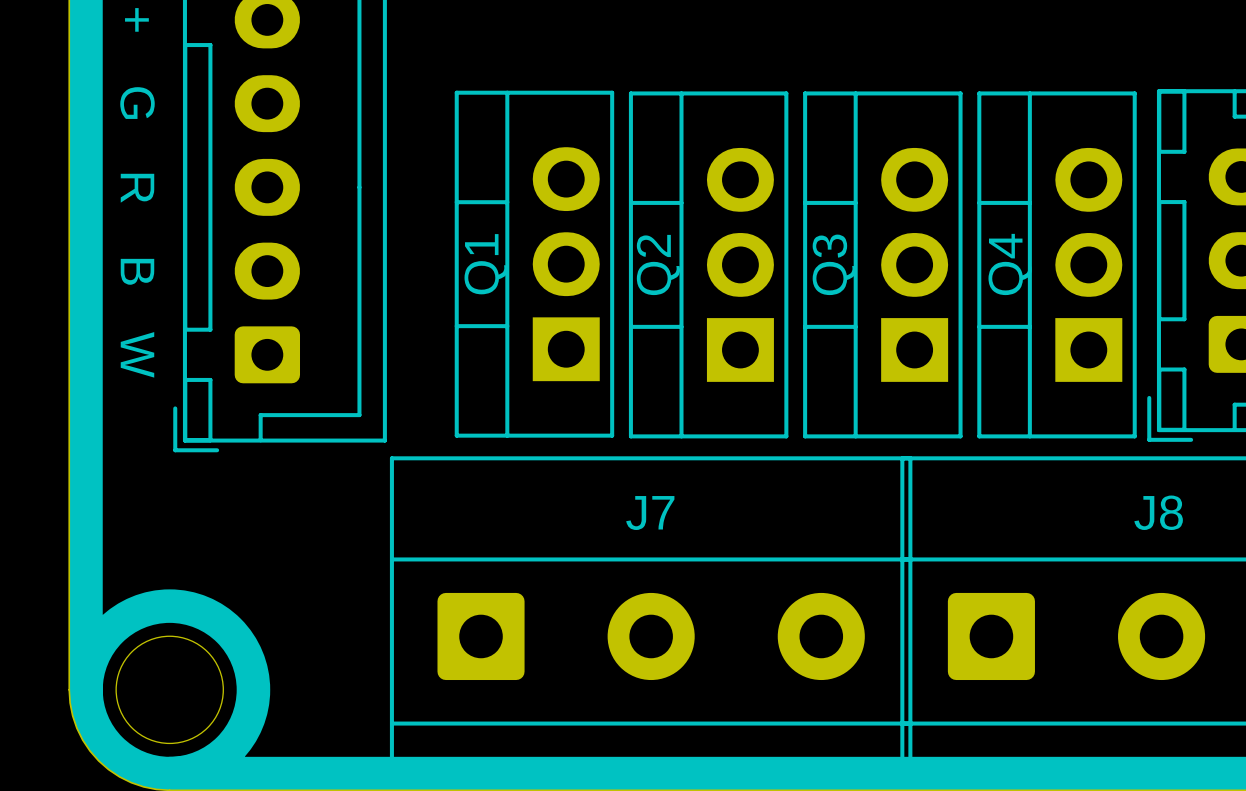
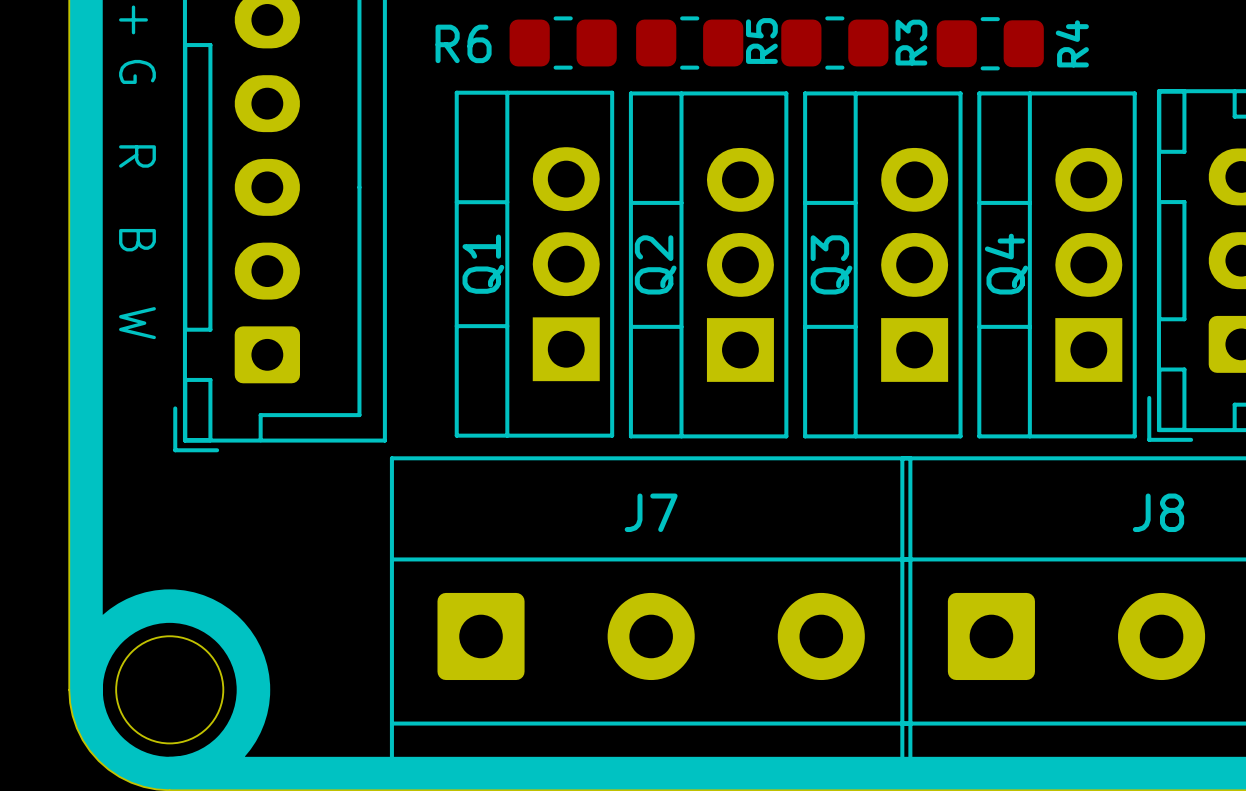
R6: none -> (563, 43)
R5: none -> (689, 43)
R3: none -> (834, 43)
R4: none -> (990, 43)
text position: G (137, 103) -> G (137, 71)
text position: R (137, 188) -> R (137, 156)
text position: B (137, 271) -> B (137, 240)
text position: W (137, 354) -> W (137, 323)

